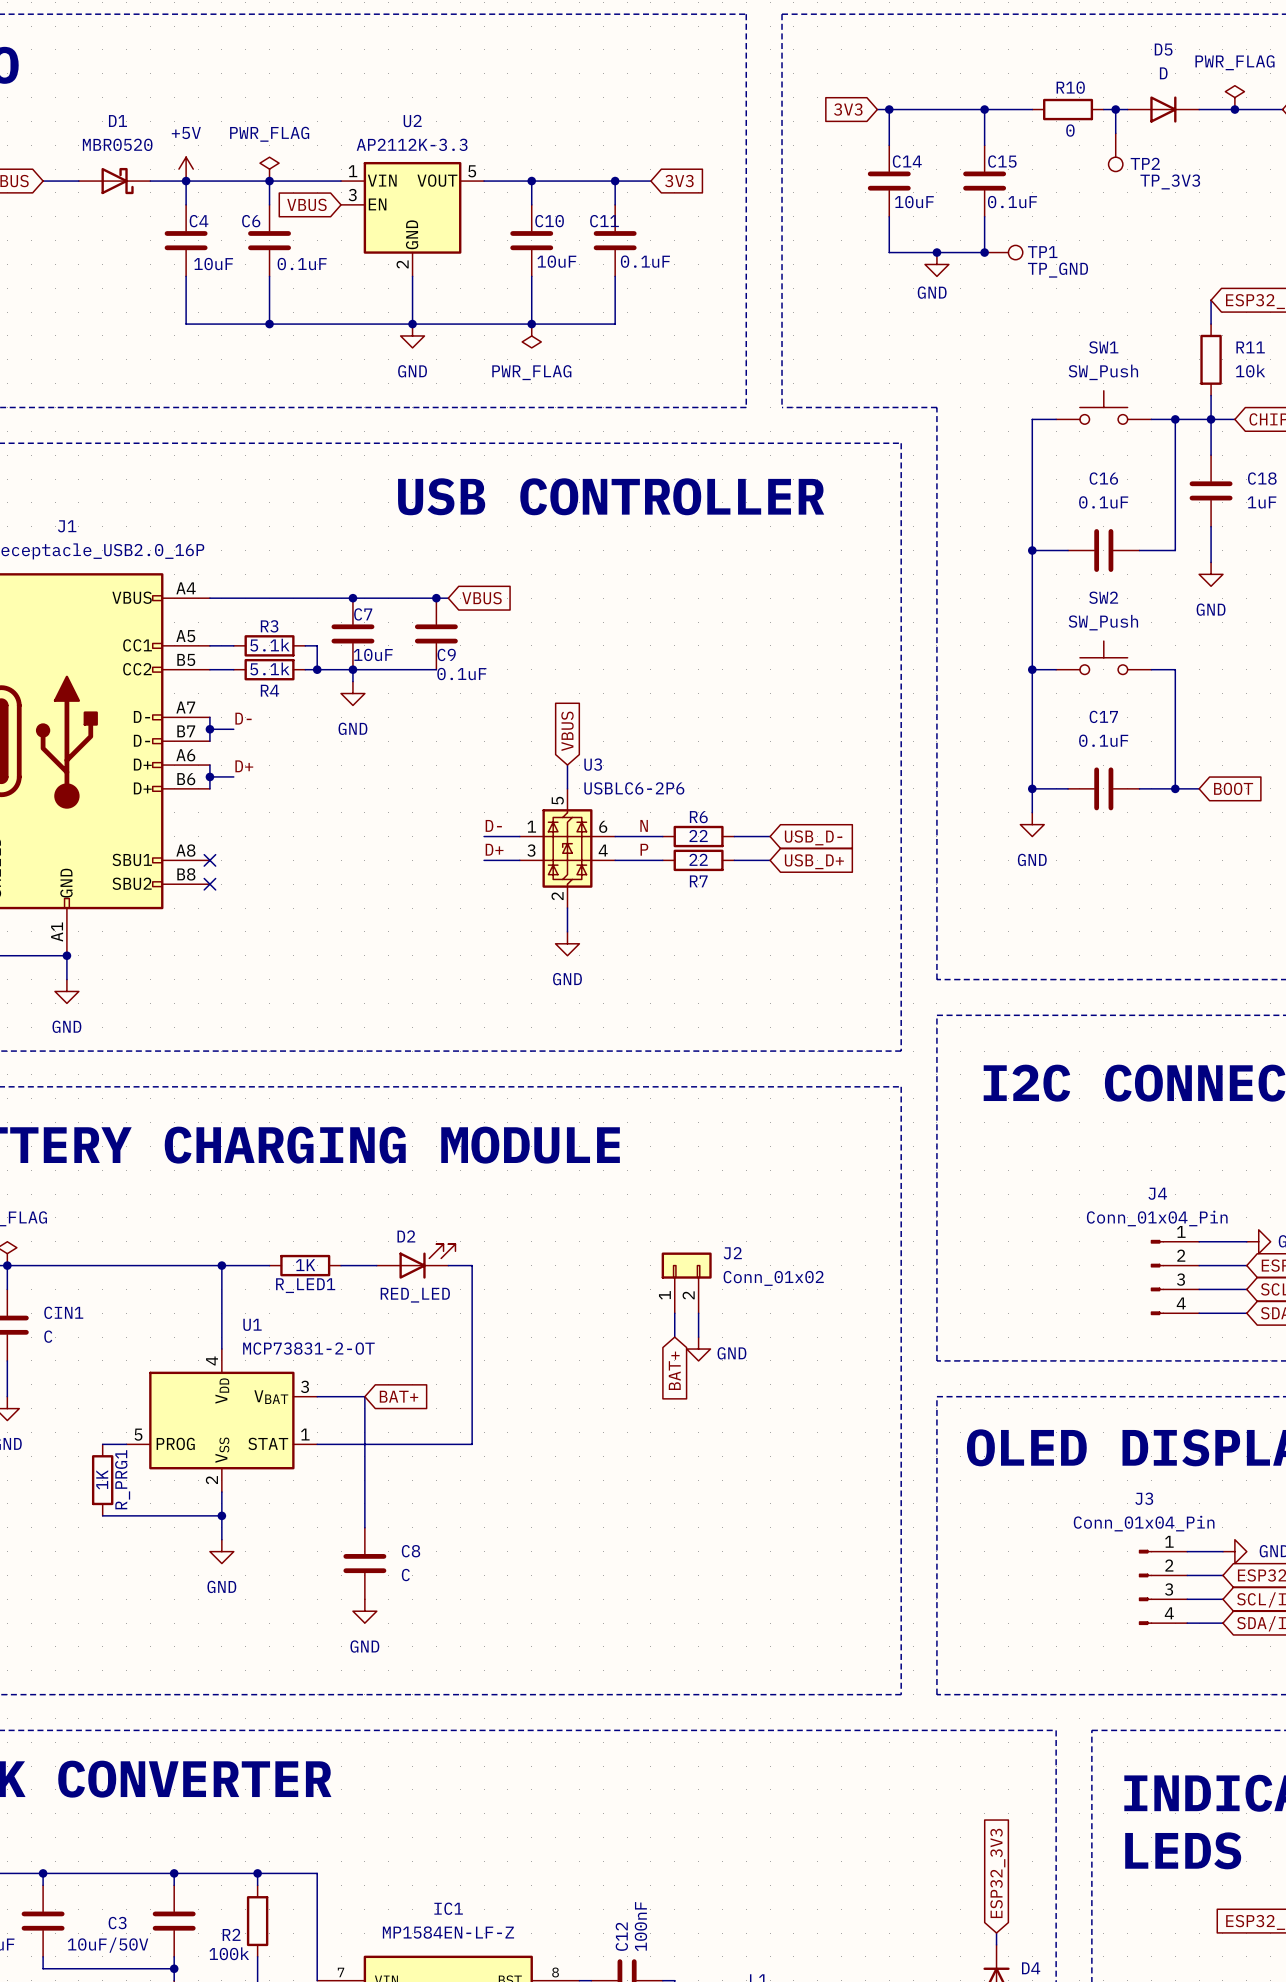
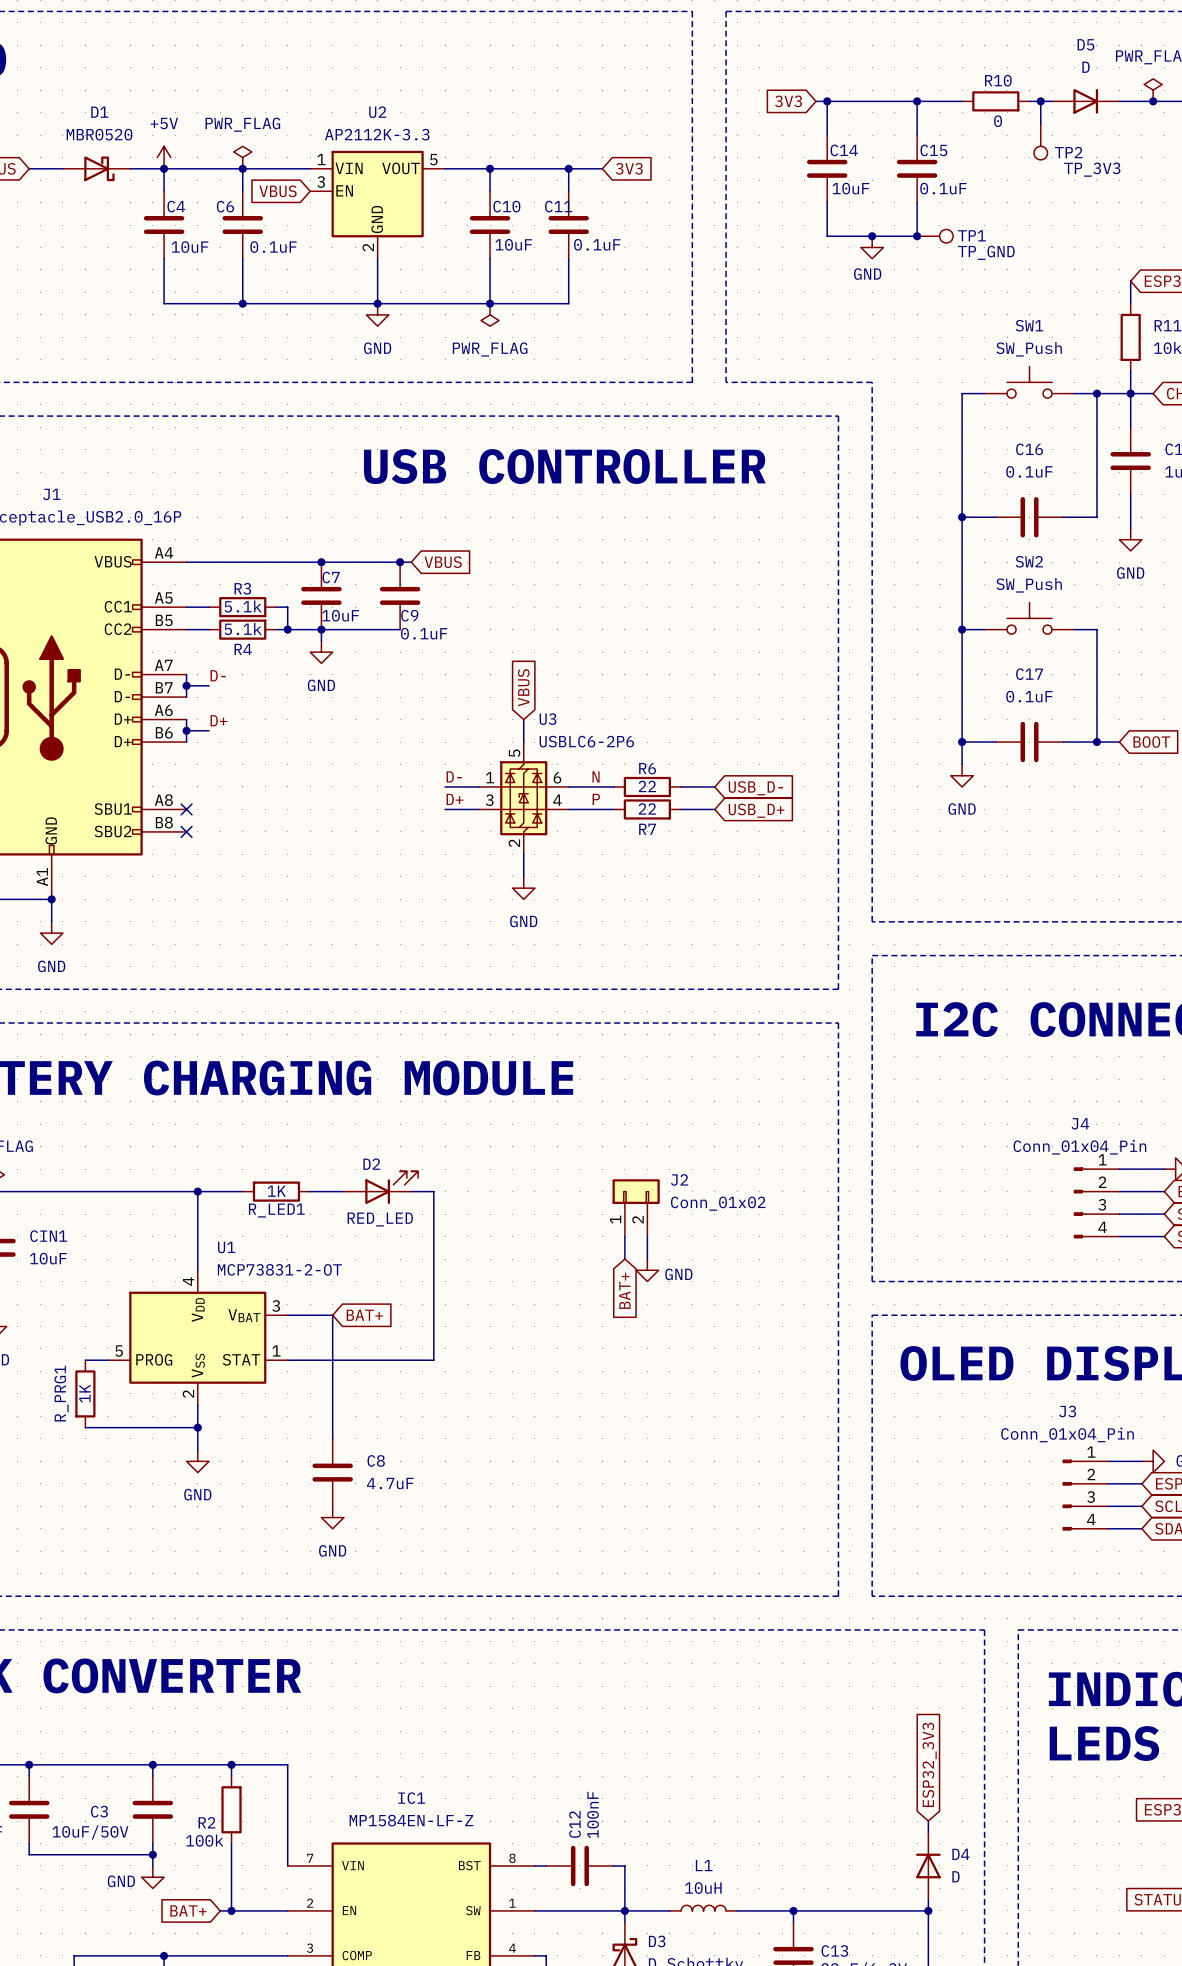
CIN1 value: C (48, 1336) -> 10uF (48, 1258)
R_PRG1 name position: R_PRG1 (122, 1479) -> R_PRG1 (61, 1393)
C8 value: C (405, 1575) -> 4.7uF (390, 1483)

